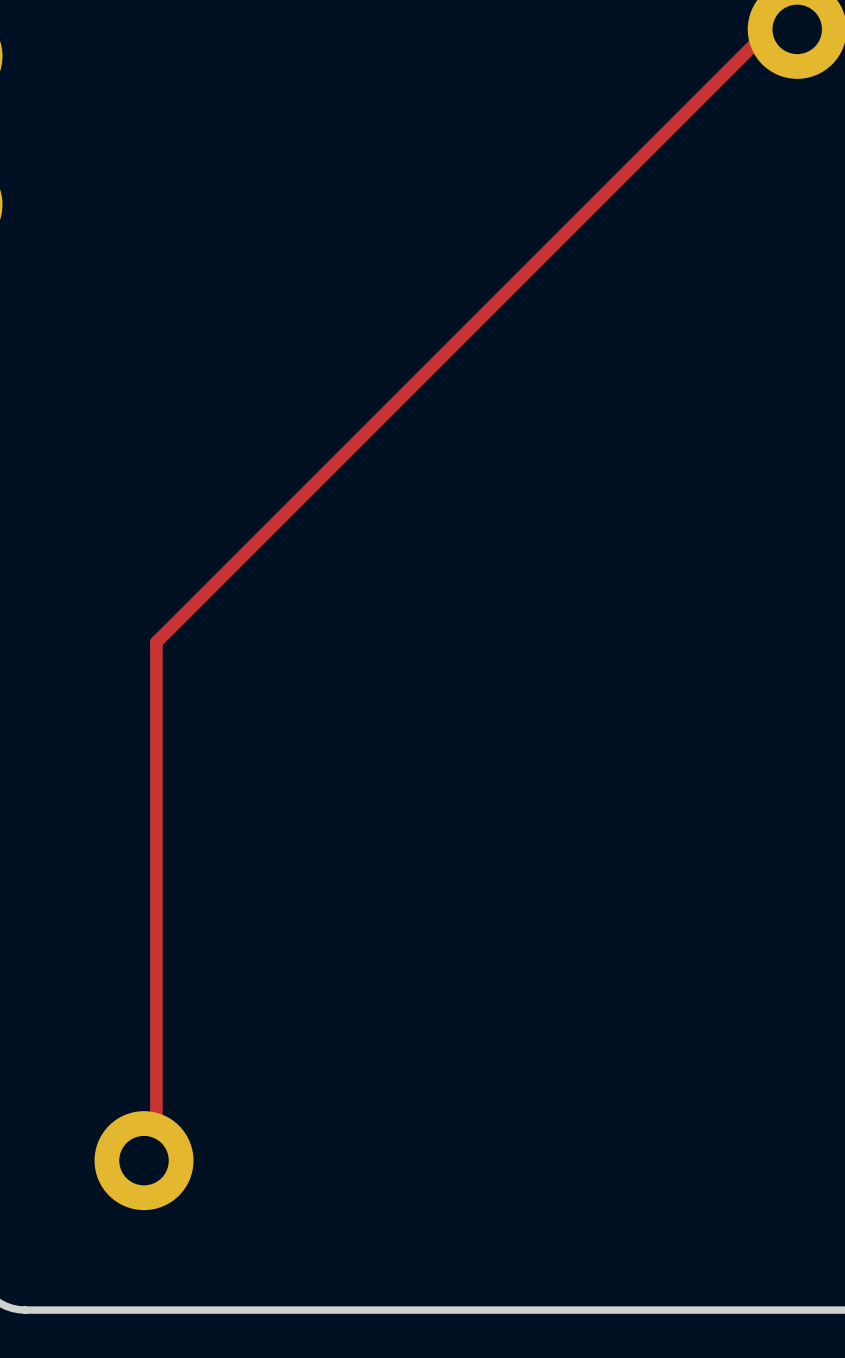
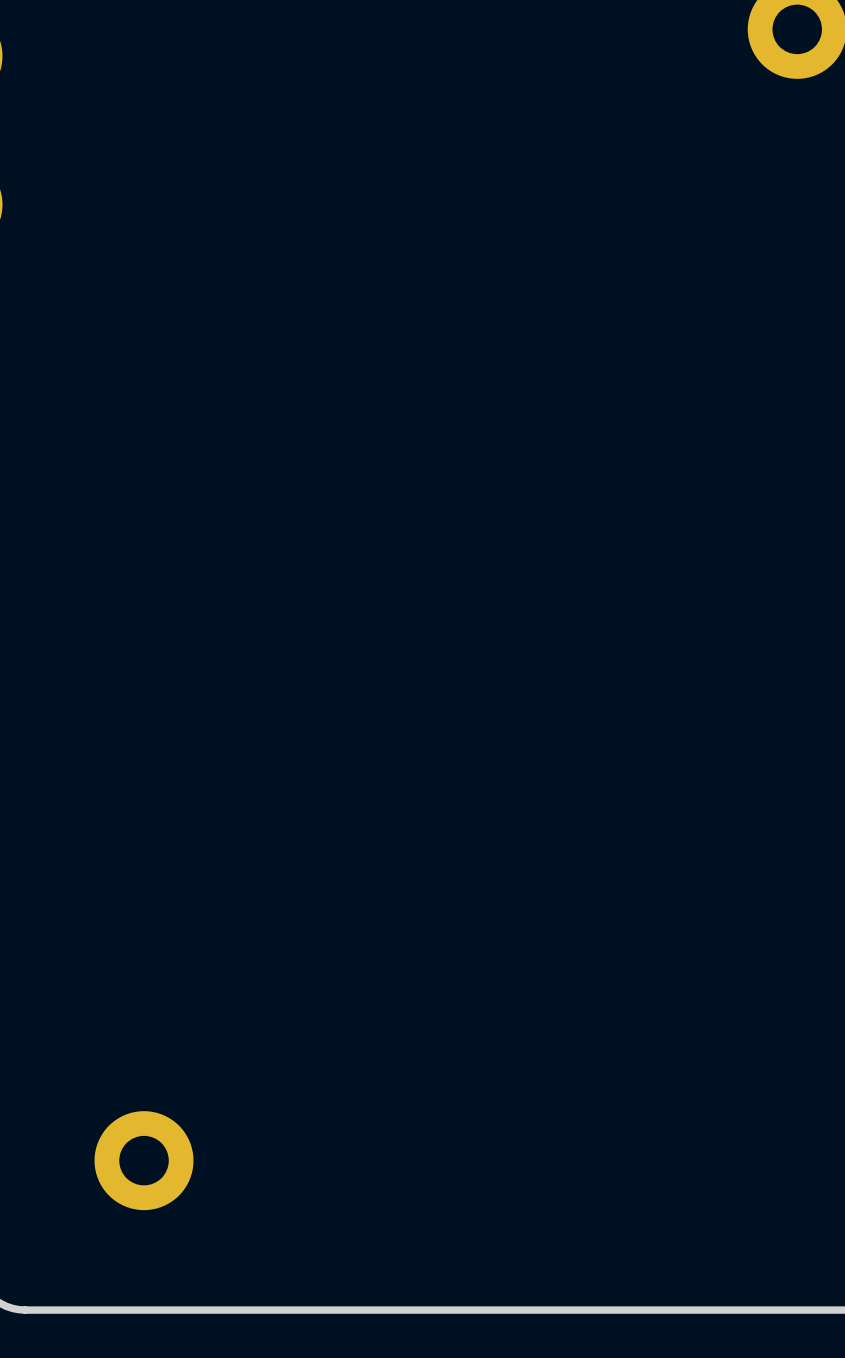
track: (797, 29) (784, 13) (156, 642) (156, 1145) (144, 1160) -> none

